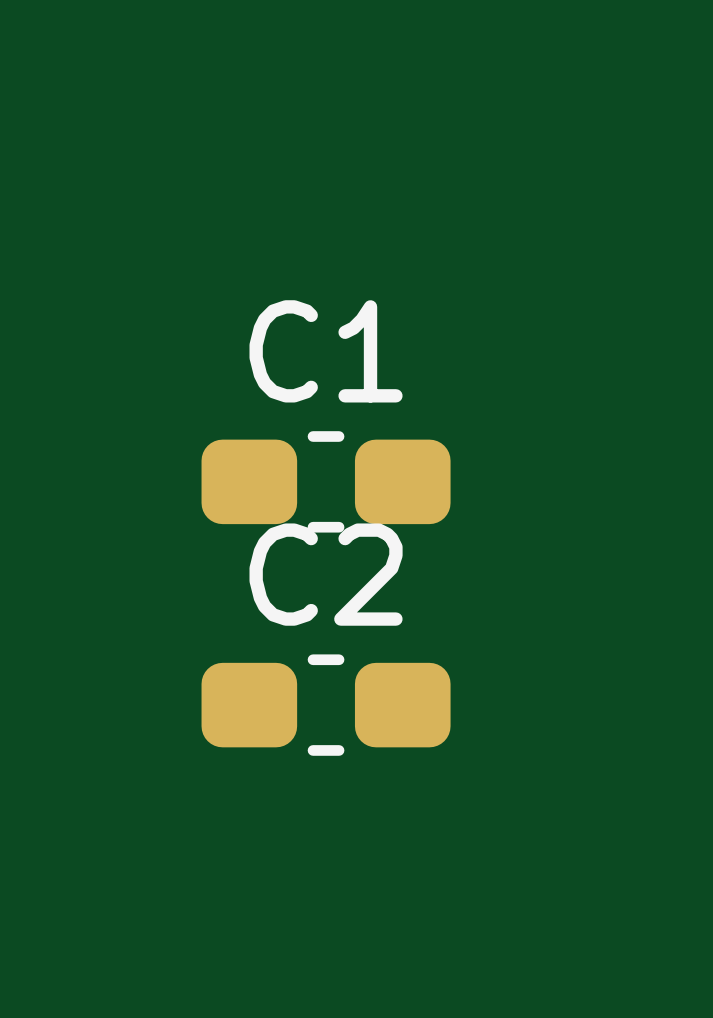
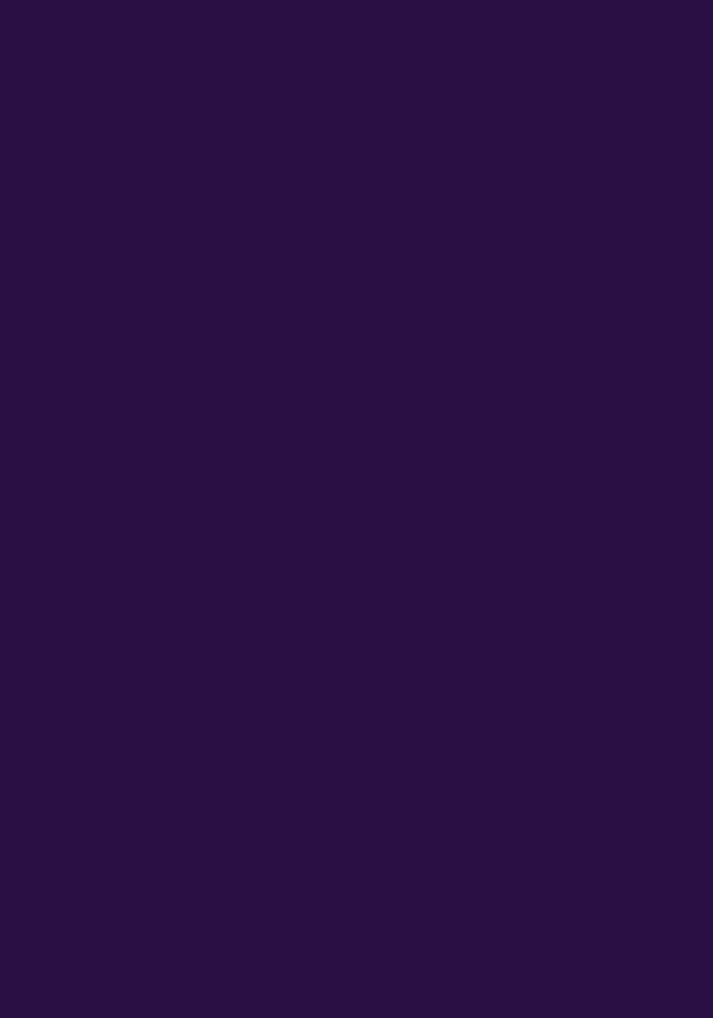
C1: (326, 481) -> none
C2: (326, 705) -> none

